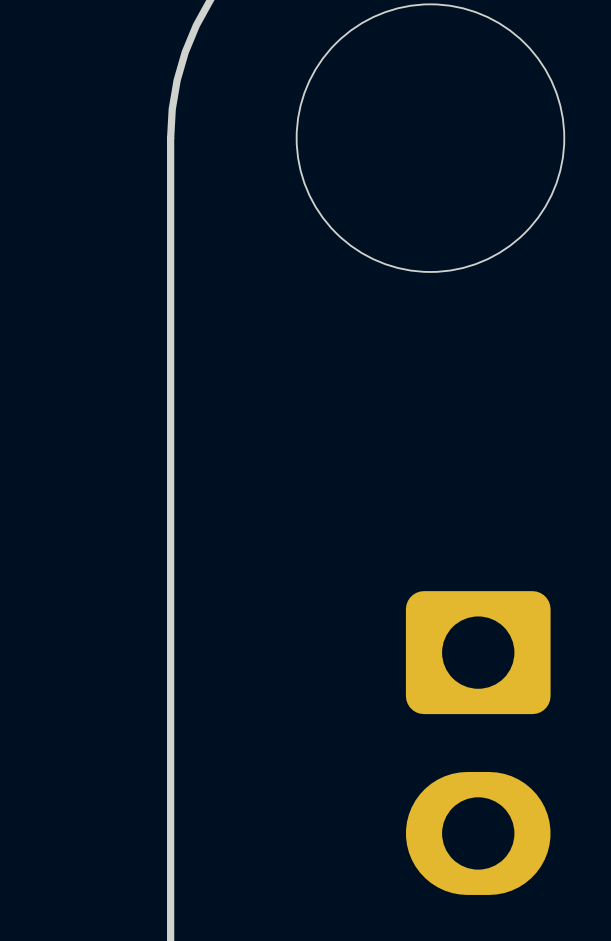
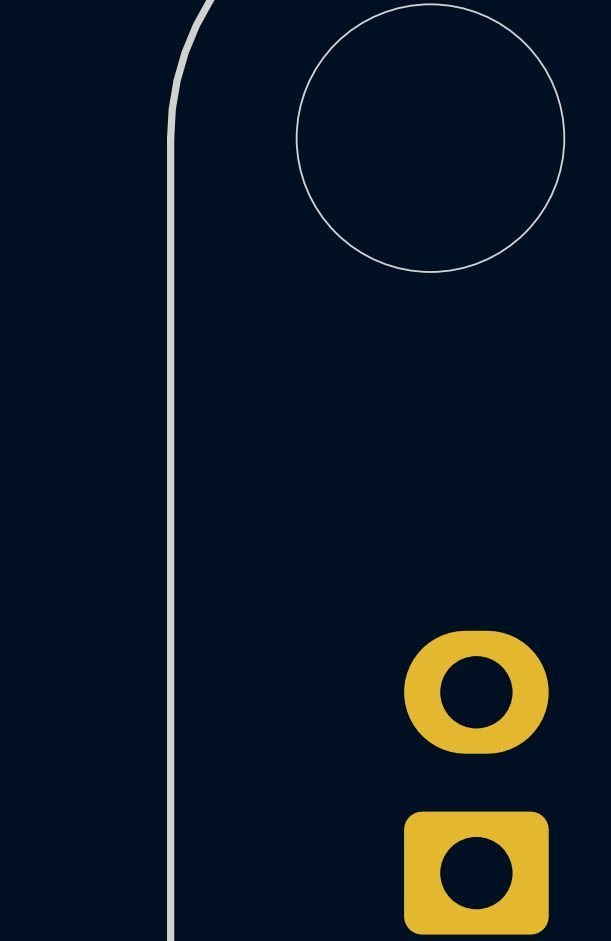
part rotation: 0° (478, 743) -> 180° (476, 782)

